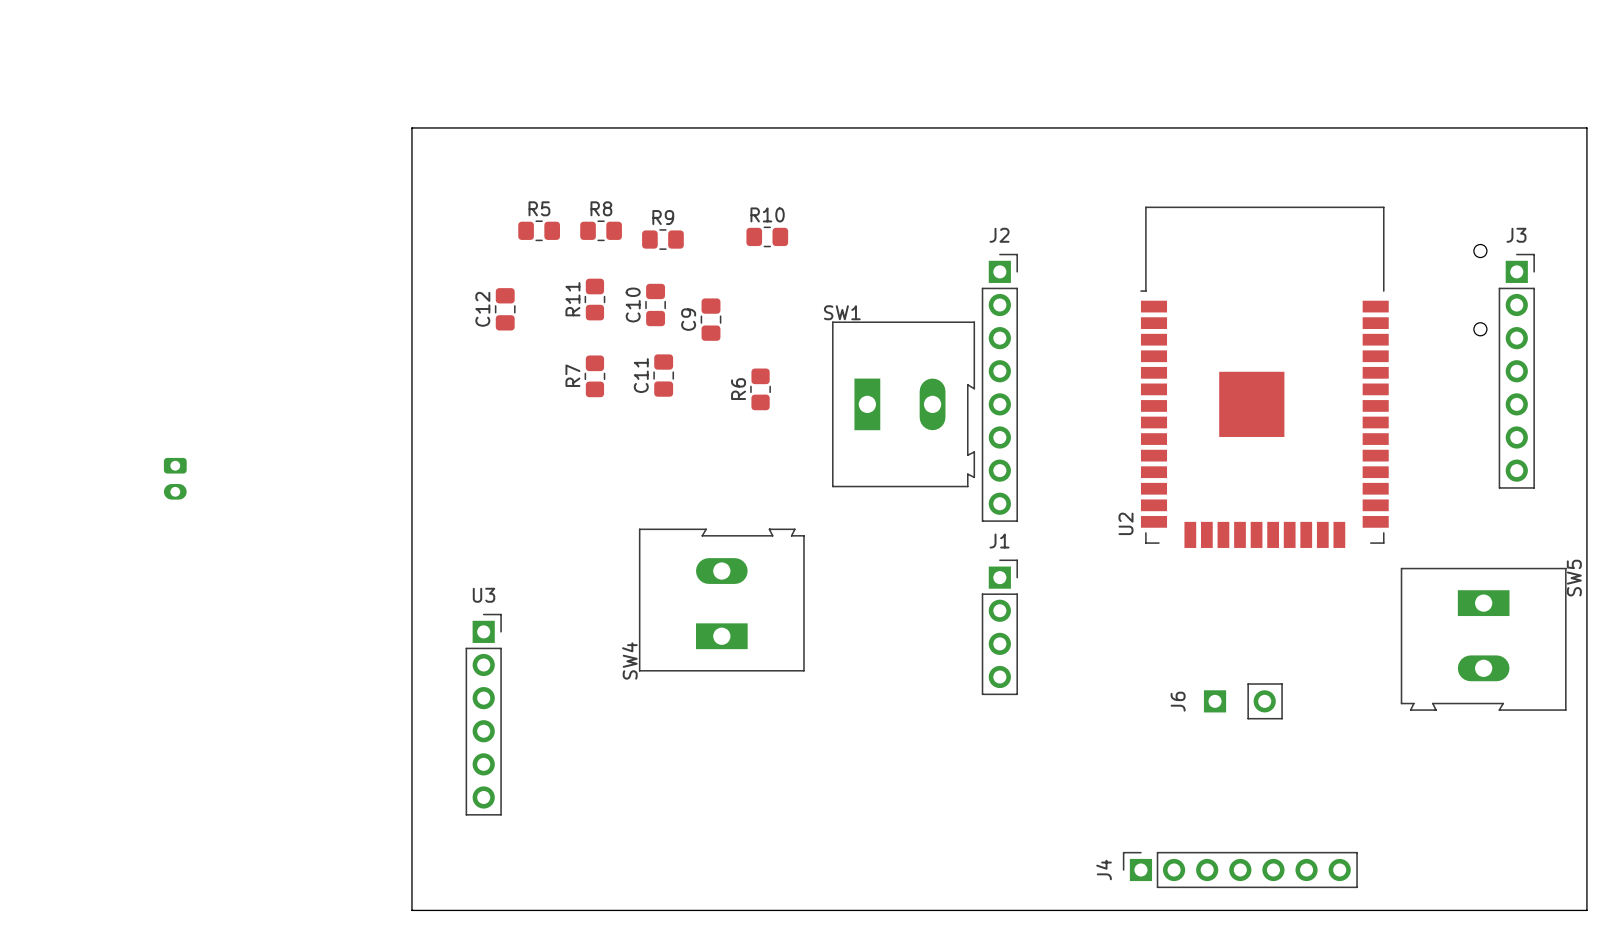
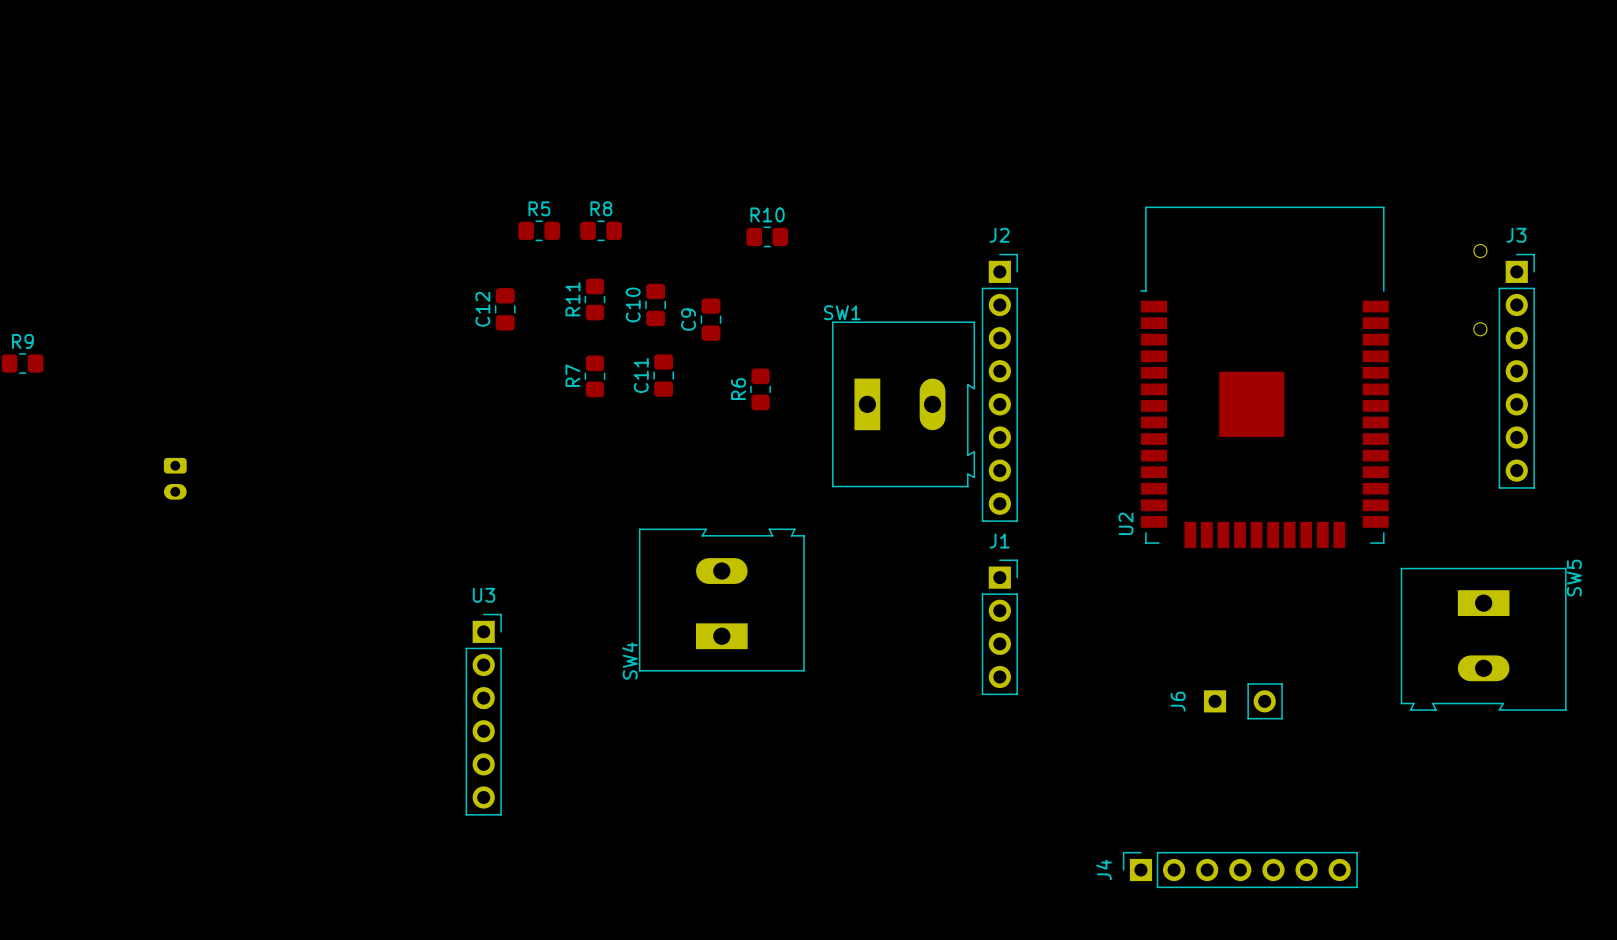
board edge: (411, 127) (1586, 127) (1586, 910) (411, 910) (411, 127) -> none
R9 position: (662, 239) -> (22, 363)

